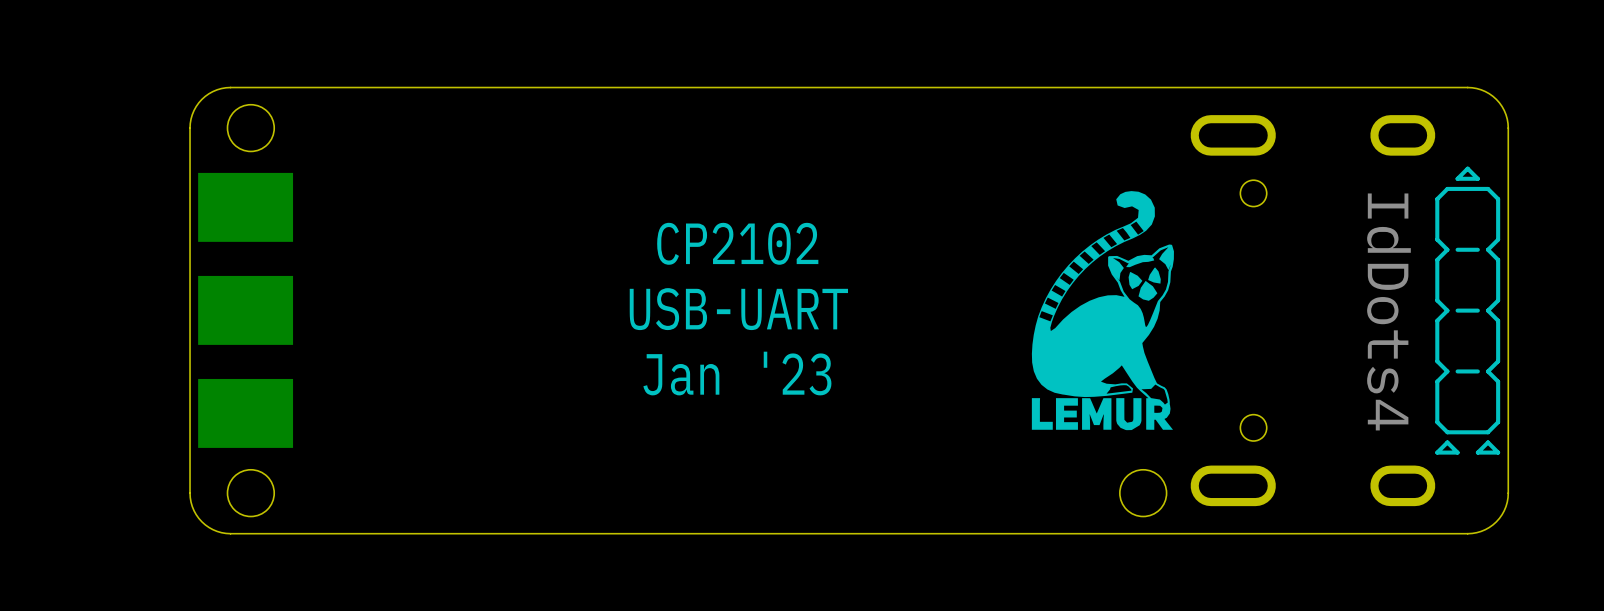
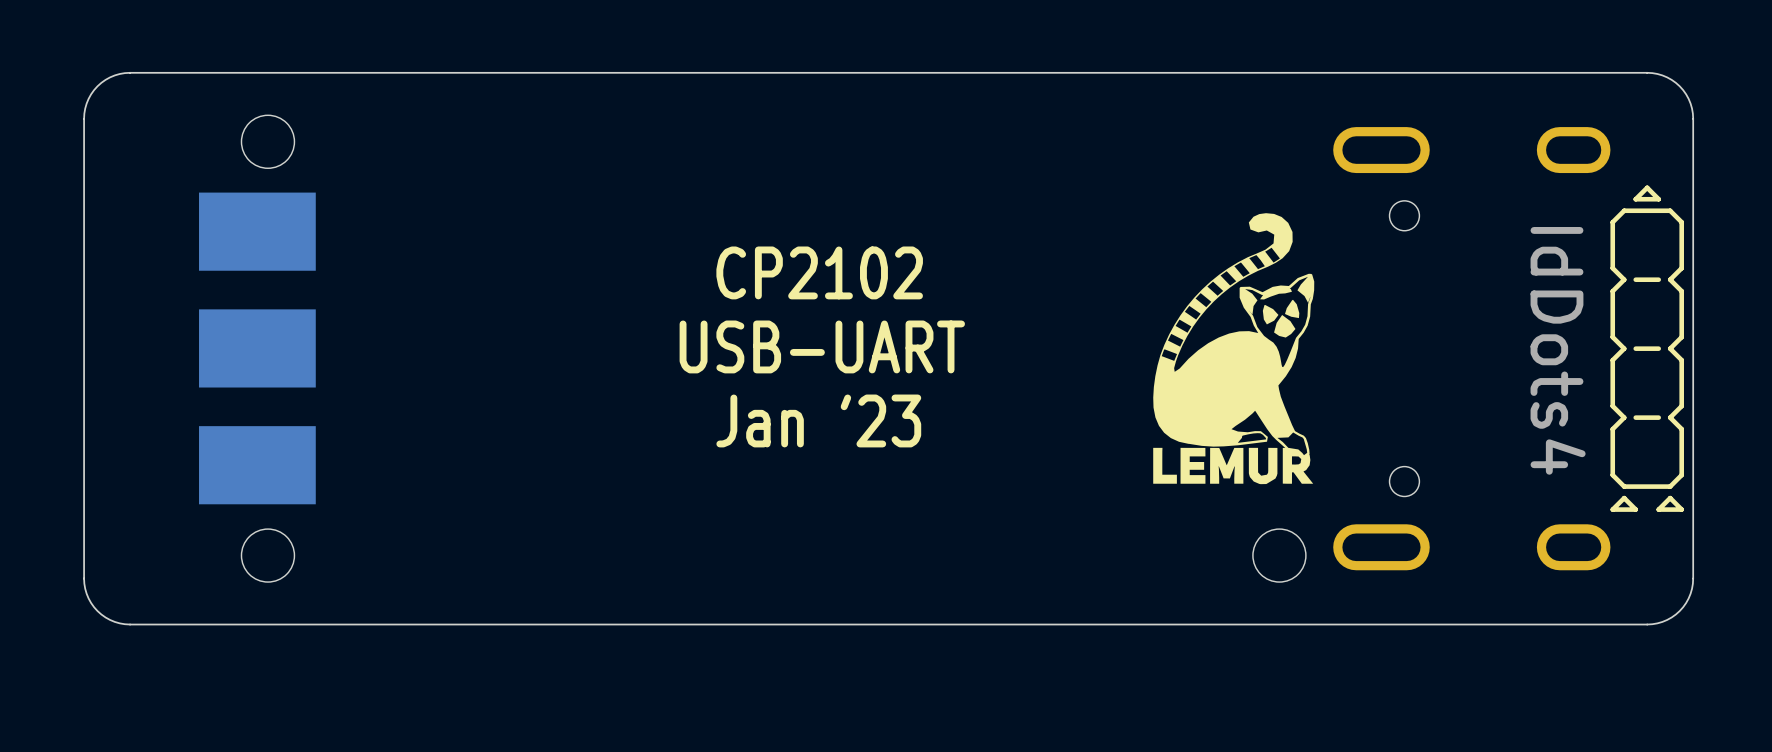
board edge: (1508, 128) (1504, 110) (1496, 99) (1481, 89) (1467, 87) (230, 87) (212, 91) (201, 99) (194, 110) (190, 128) (190, 497) (194, 510) (201, 521) (209, 527) (221, 532) (1467, 533) (1485, 529) (1496, 521) (1504, 510) (1508, 493) -> (1693, 141) (1692, 113) (1686, 94) (1675, 82) (1667, 77) (1647, 72) (130, 72) (110, 77) (97, 86) (88, 98) (84, 118) (84, 583) (88, 598) (94, 607) (105, 617) (119, 623) (1647, 624) (1662, 621) (1671, 617) (1686, 603) (1692, 583) (1693, 555)
part footprint: [198, 172, 294, 448] -> [199, 192, 316, 505]

